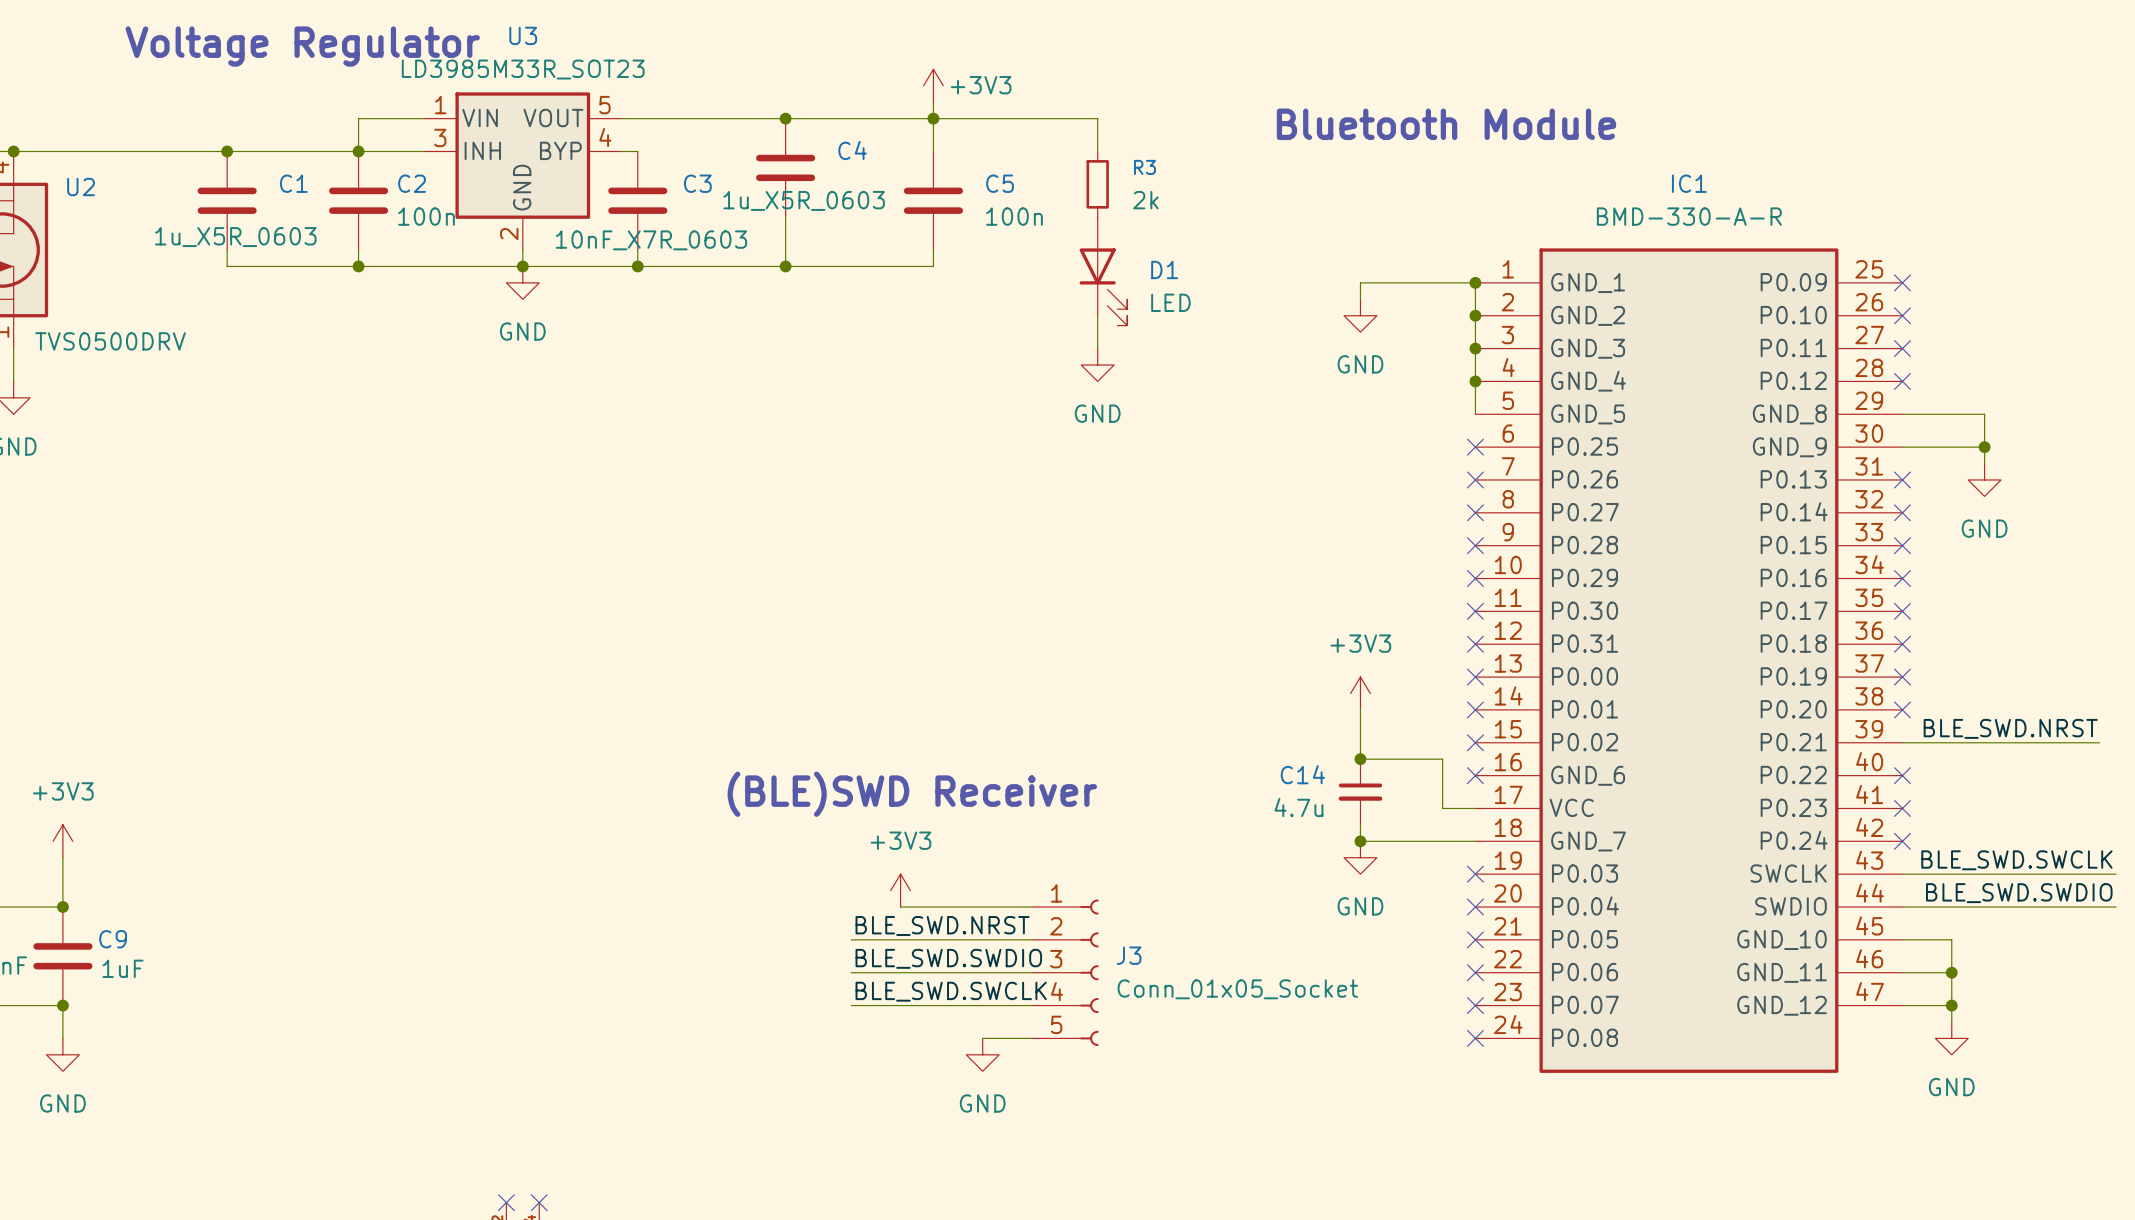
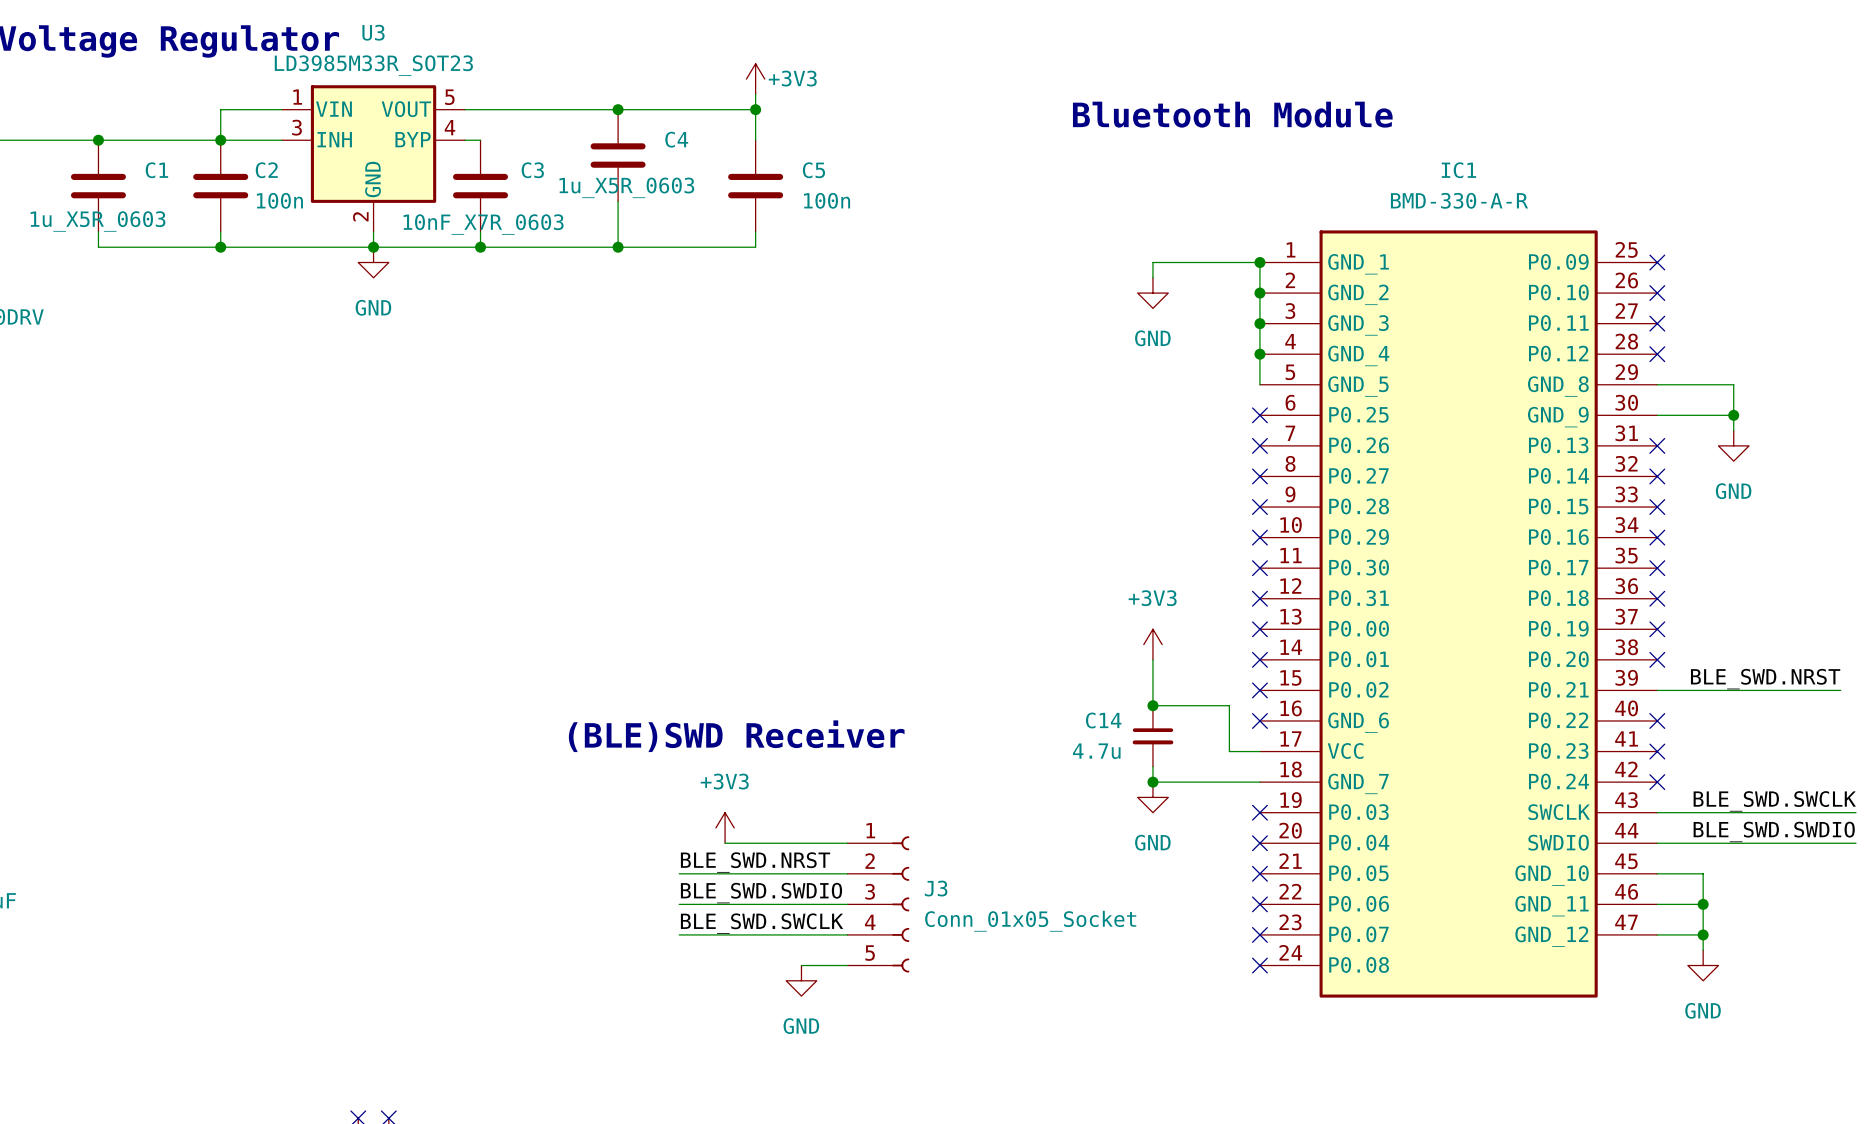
wire: (933, 118) (1097, 118) (1097, 151) -> none
R3: 2k (1097, 184) -> none
D1: LED (1103, 271) -> none
wire: (1097, 315) (1097, 348) -> none
power symbol: GND (1097, 365) -> none

